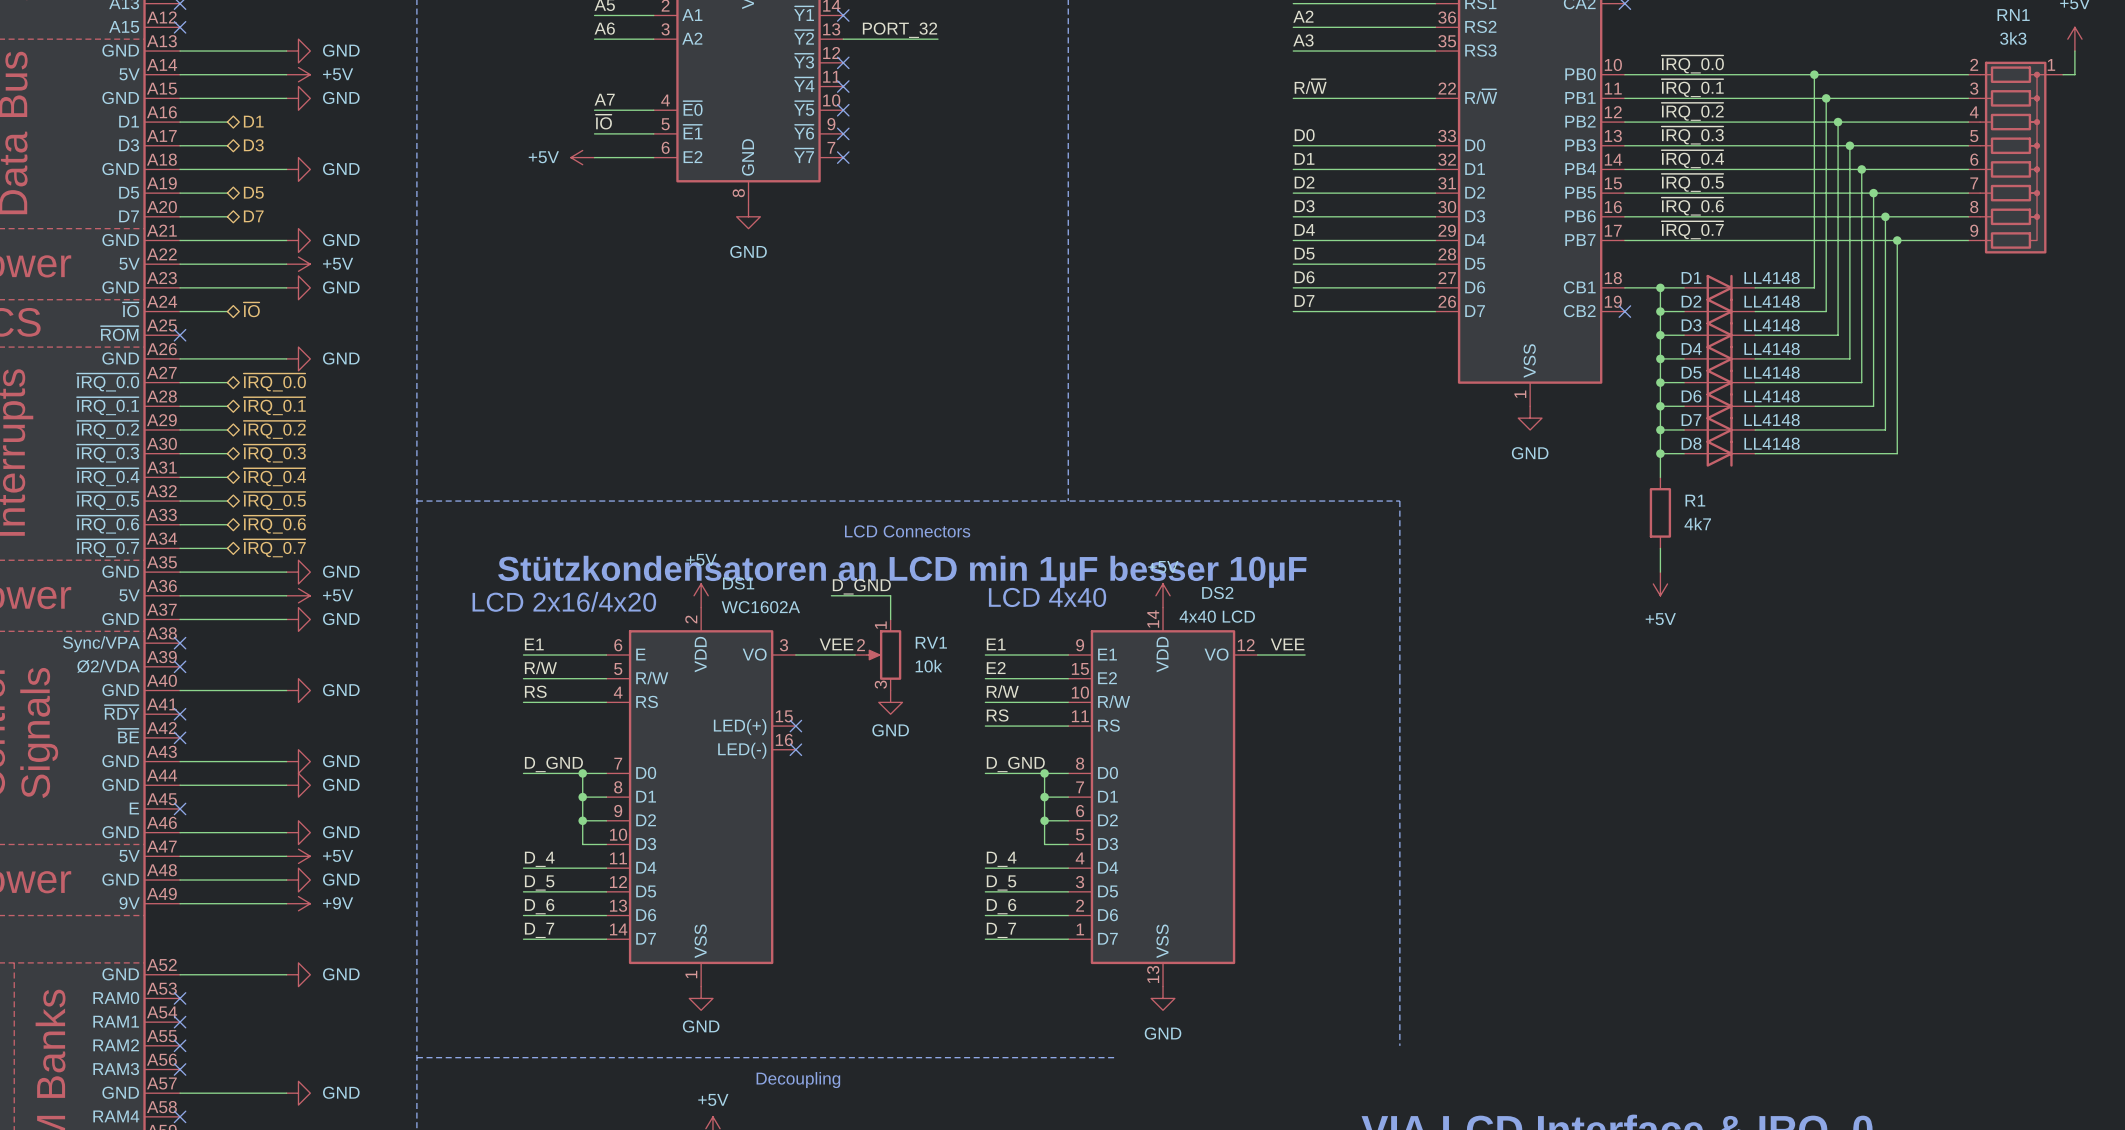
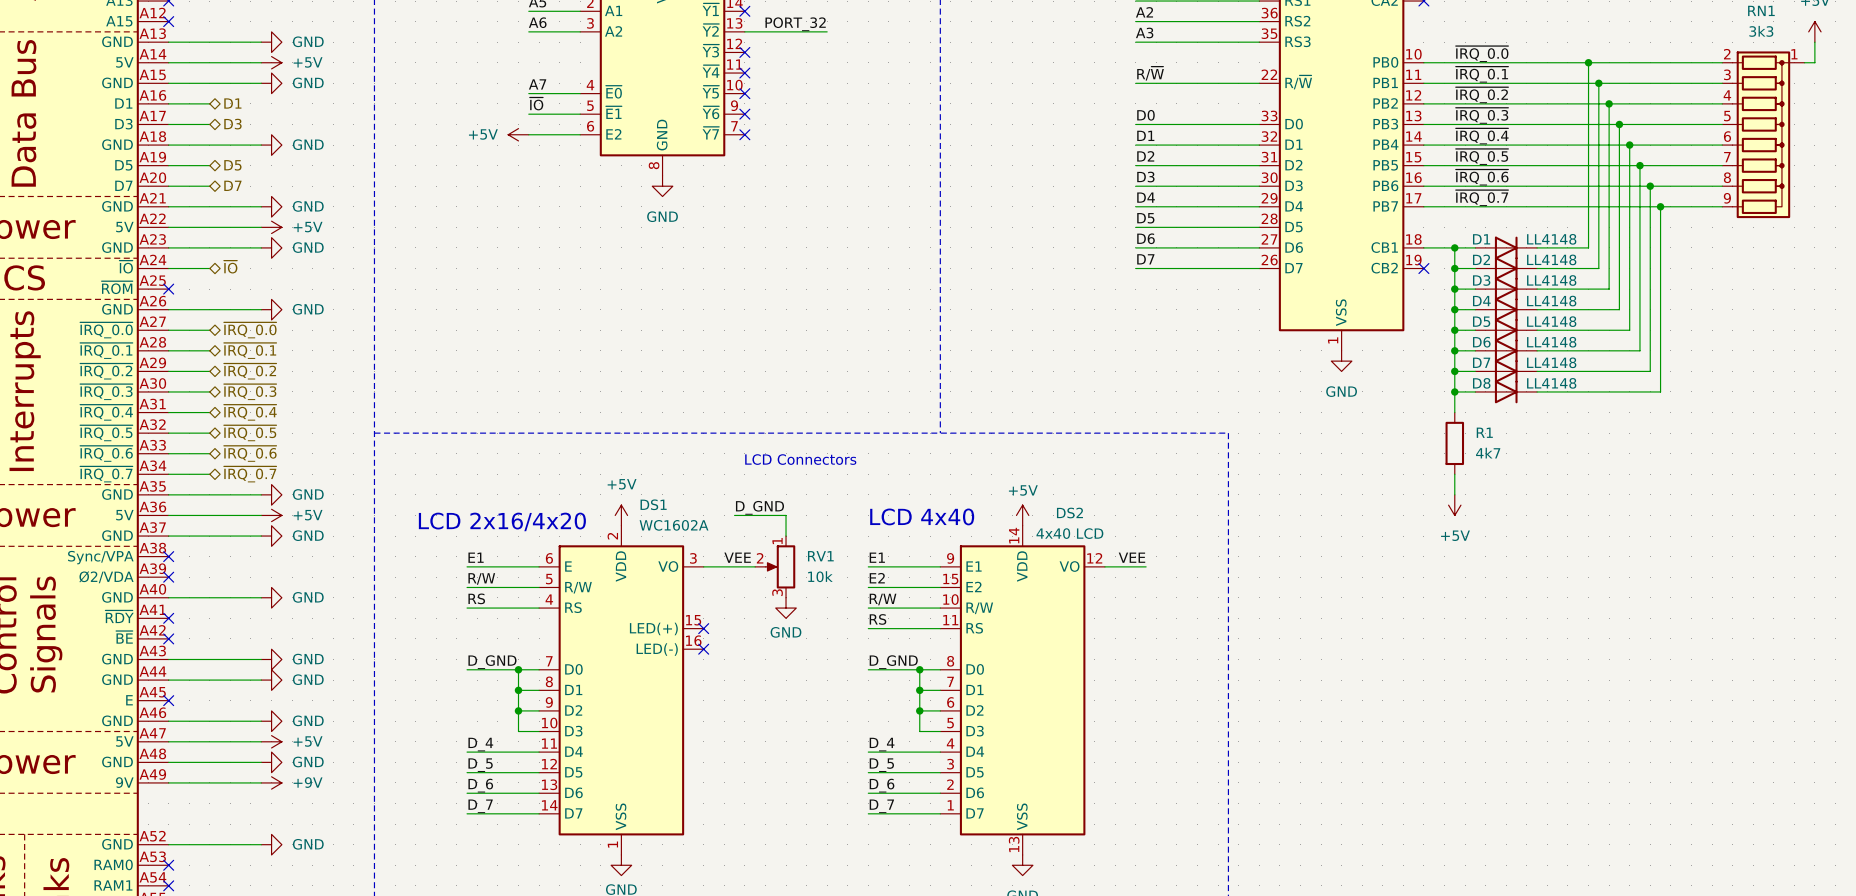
text: Stützkondensatoren an LCD min 1µF besser 10µF (902, 571) -> none

